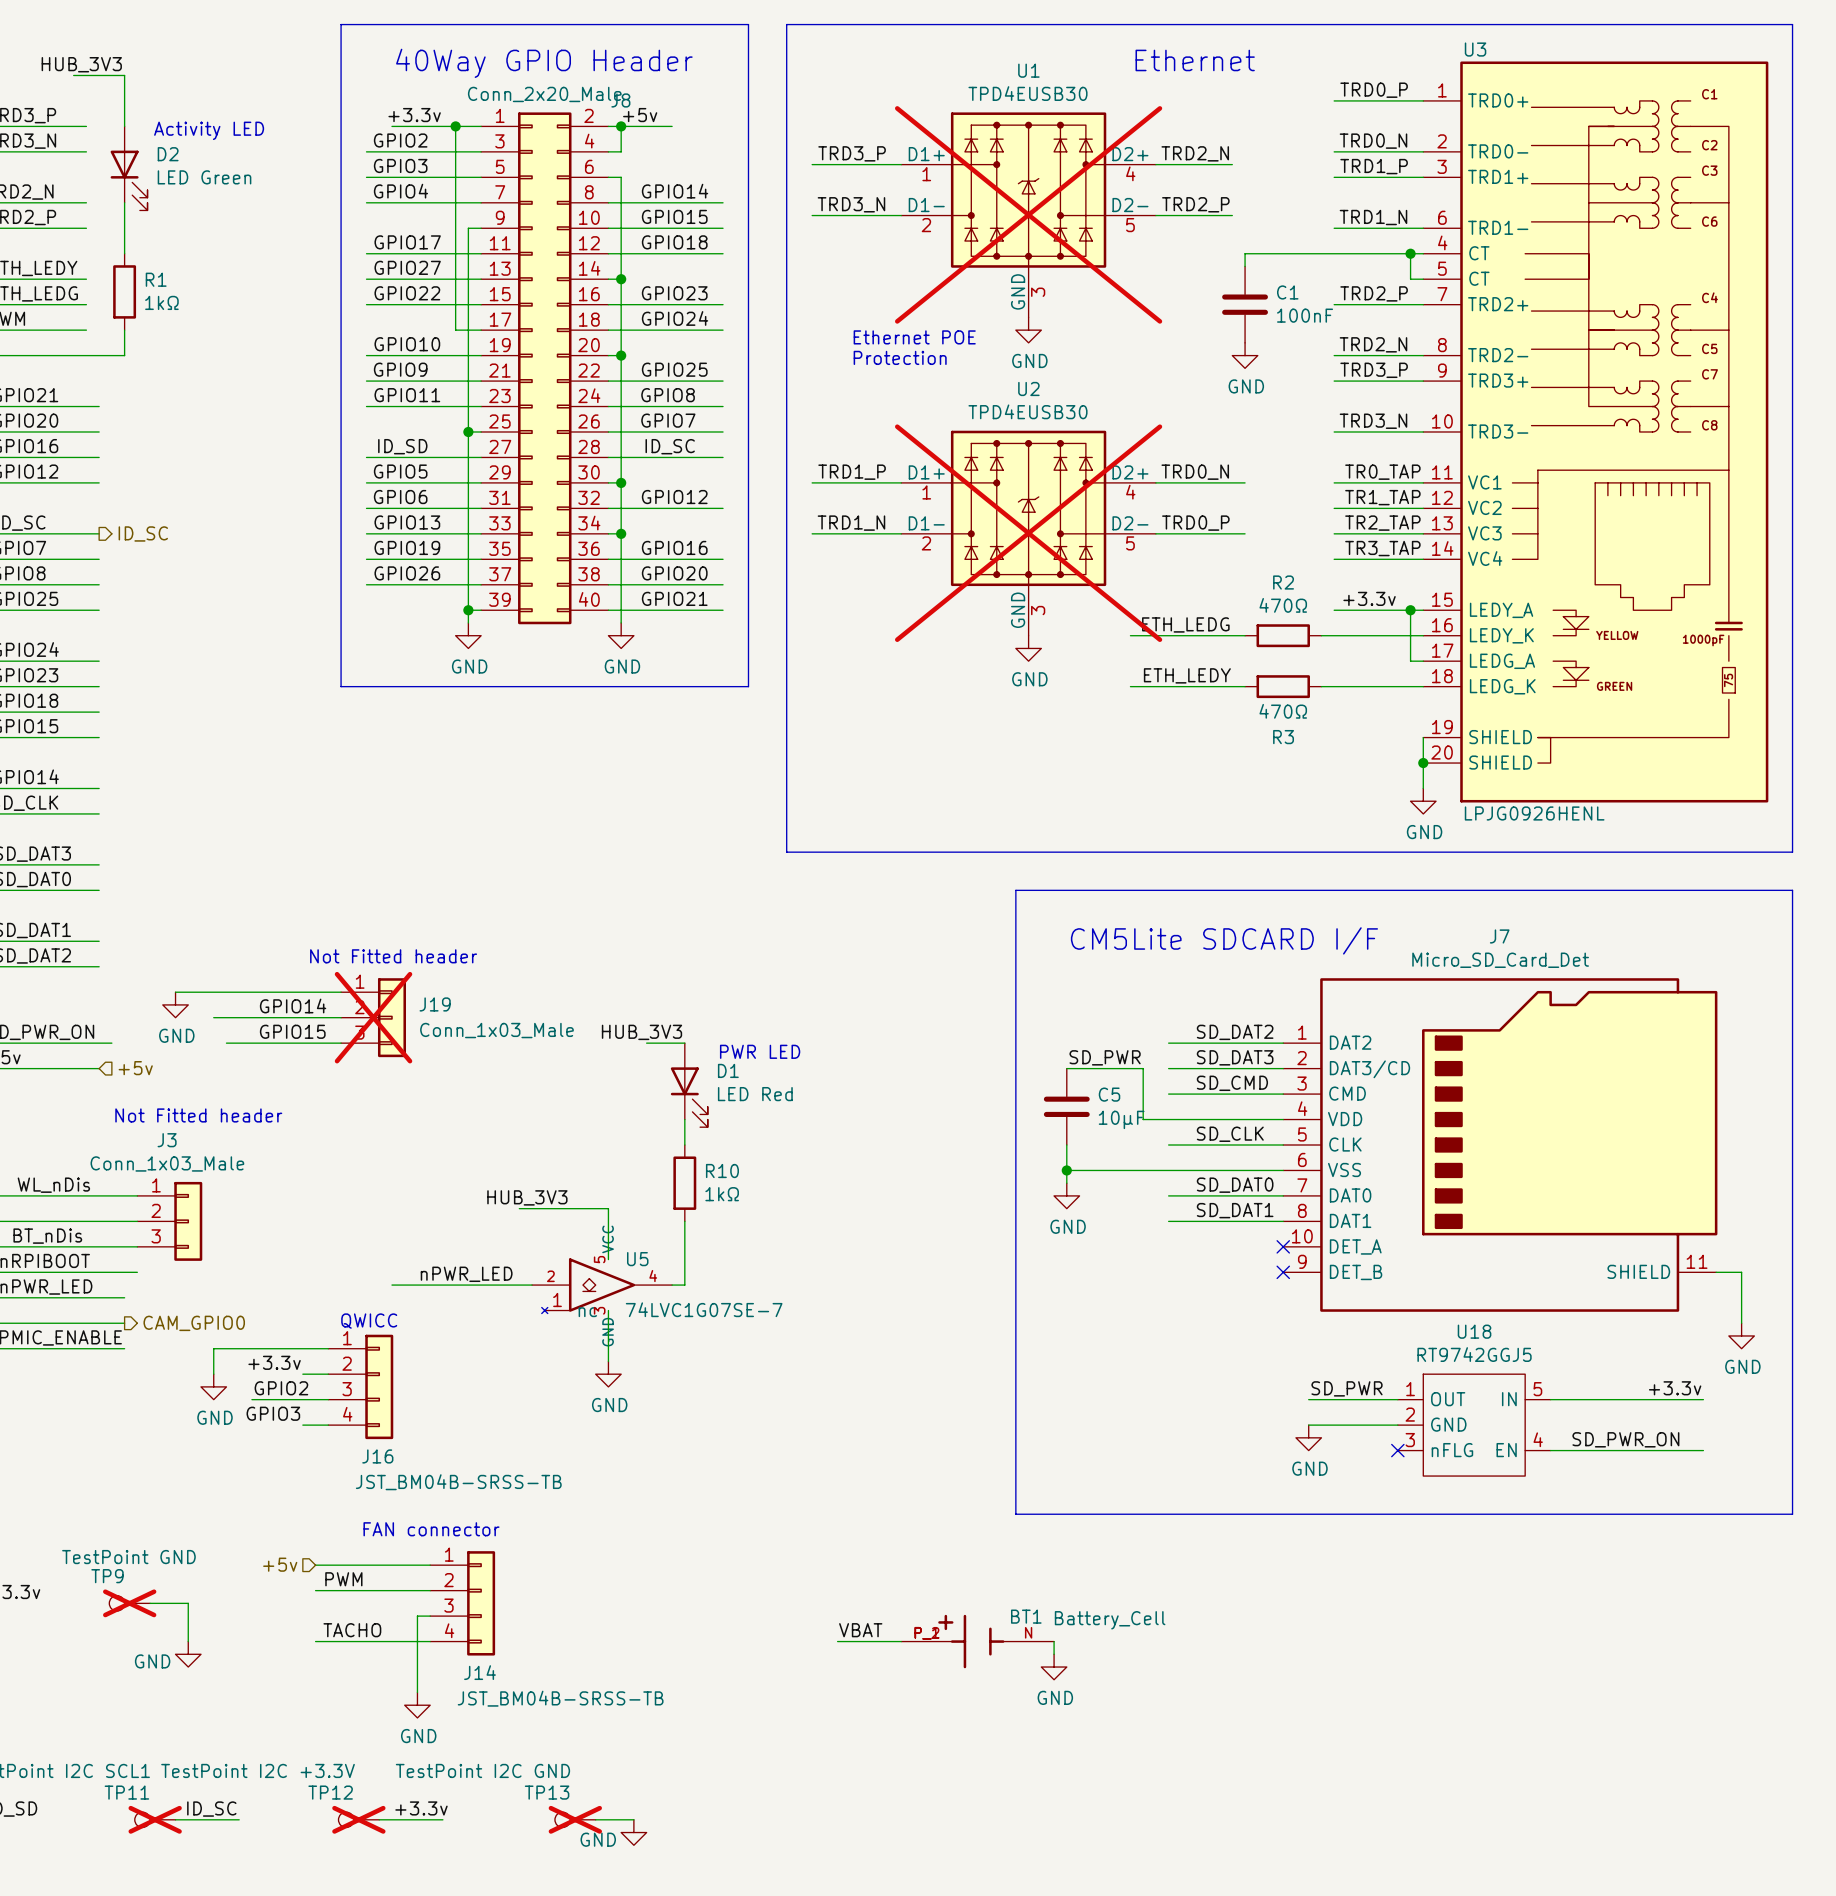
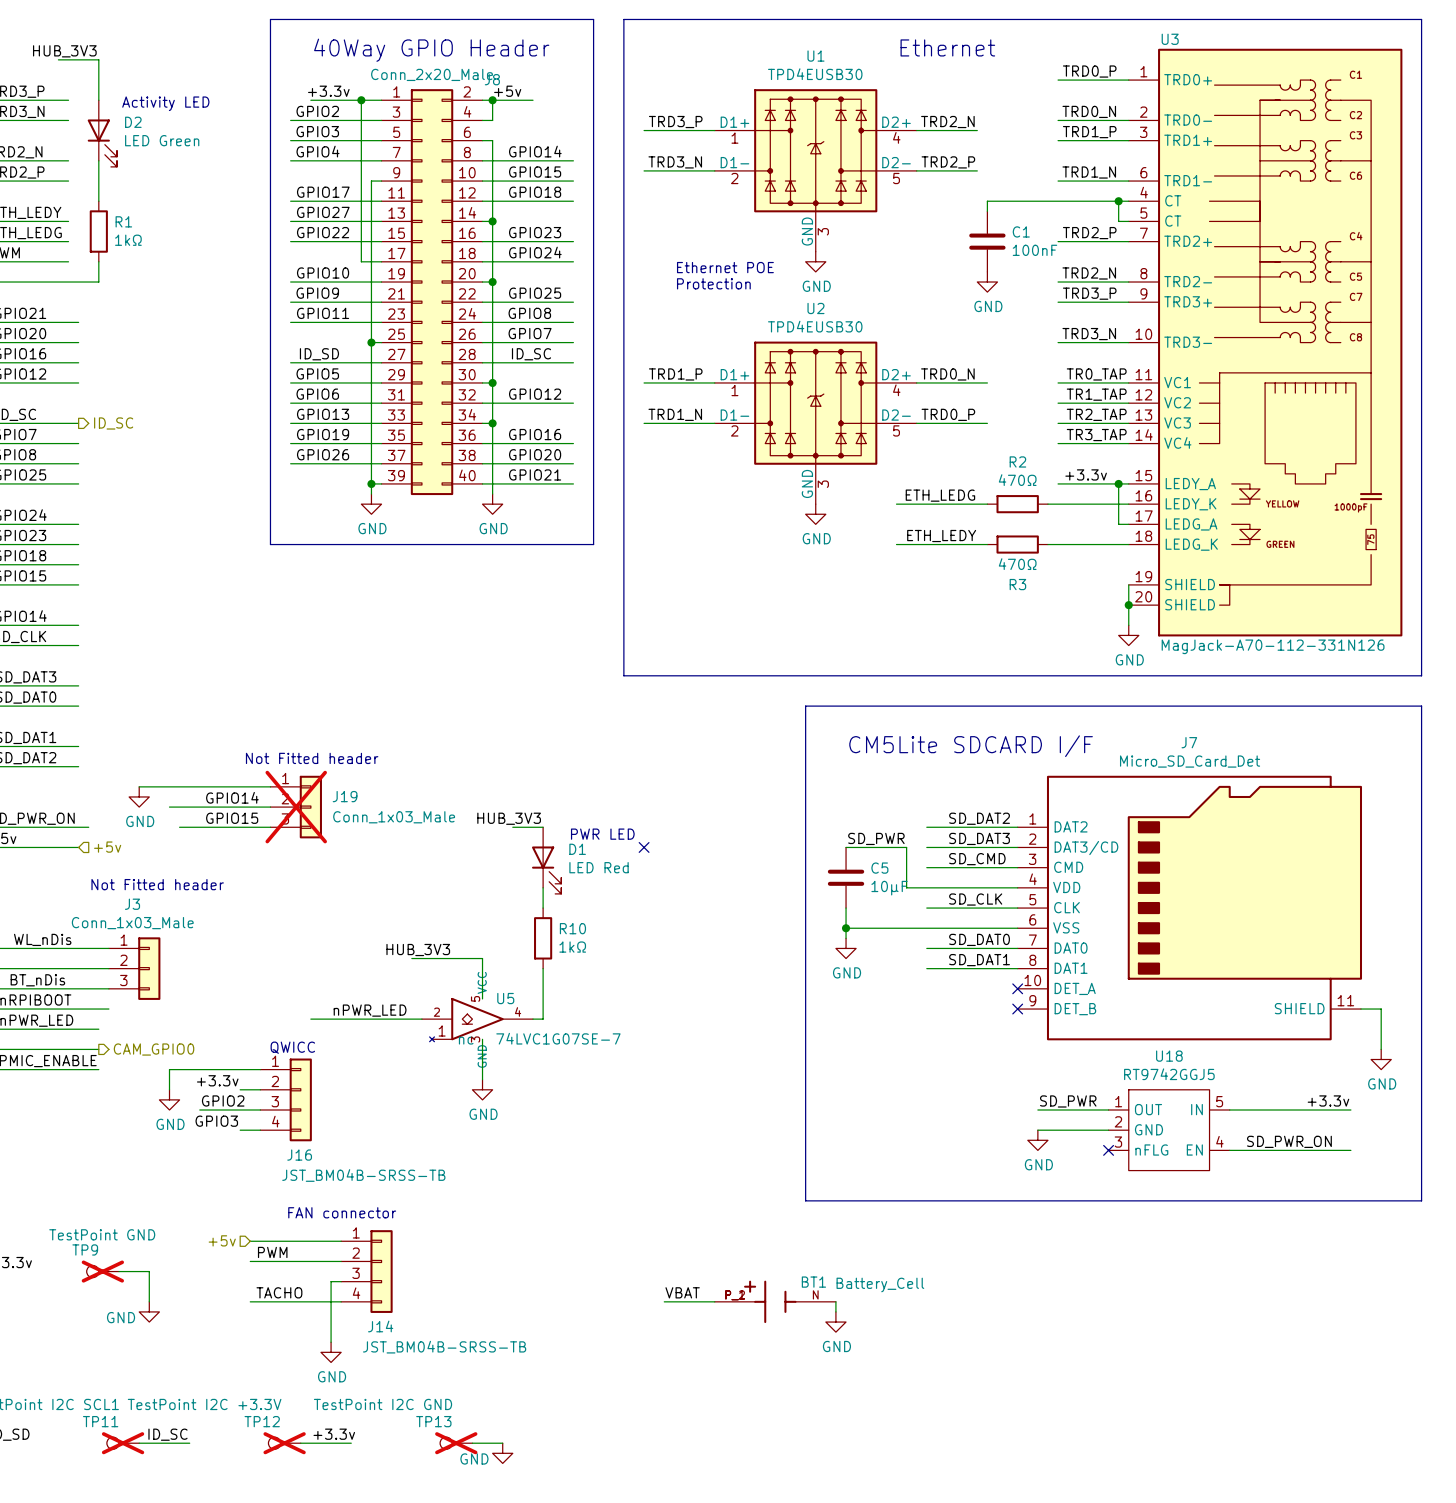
U1 do-not-place cross: (1028, 214) -> none
U2 do-not-place cross: (1028, 533) -> none
U3 value: LPJG0926HENL (1534, 813) -> MagJack-A70-112-331N126 (1273, 646)
no-connect mark: none -> (644, 847)

